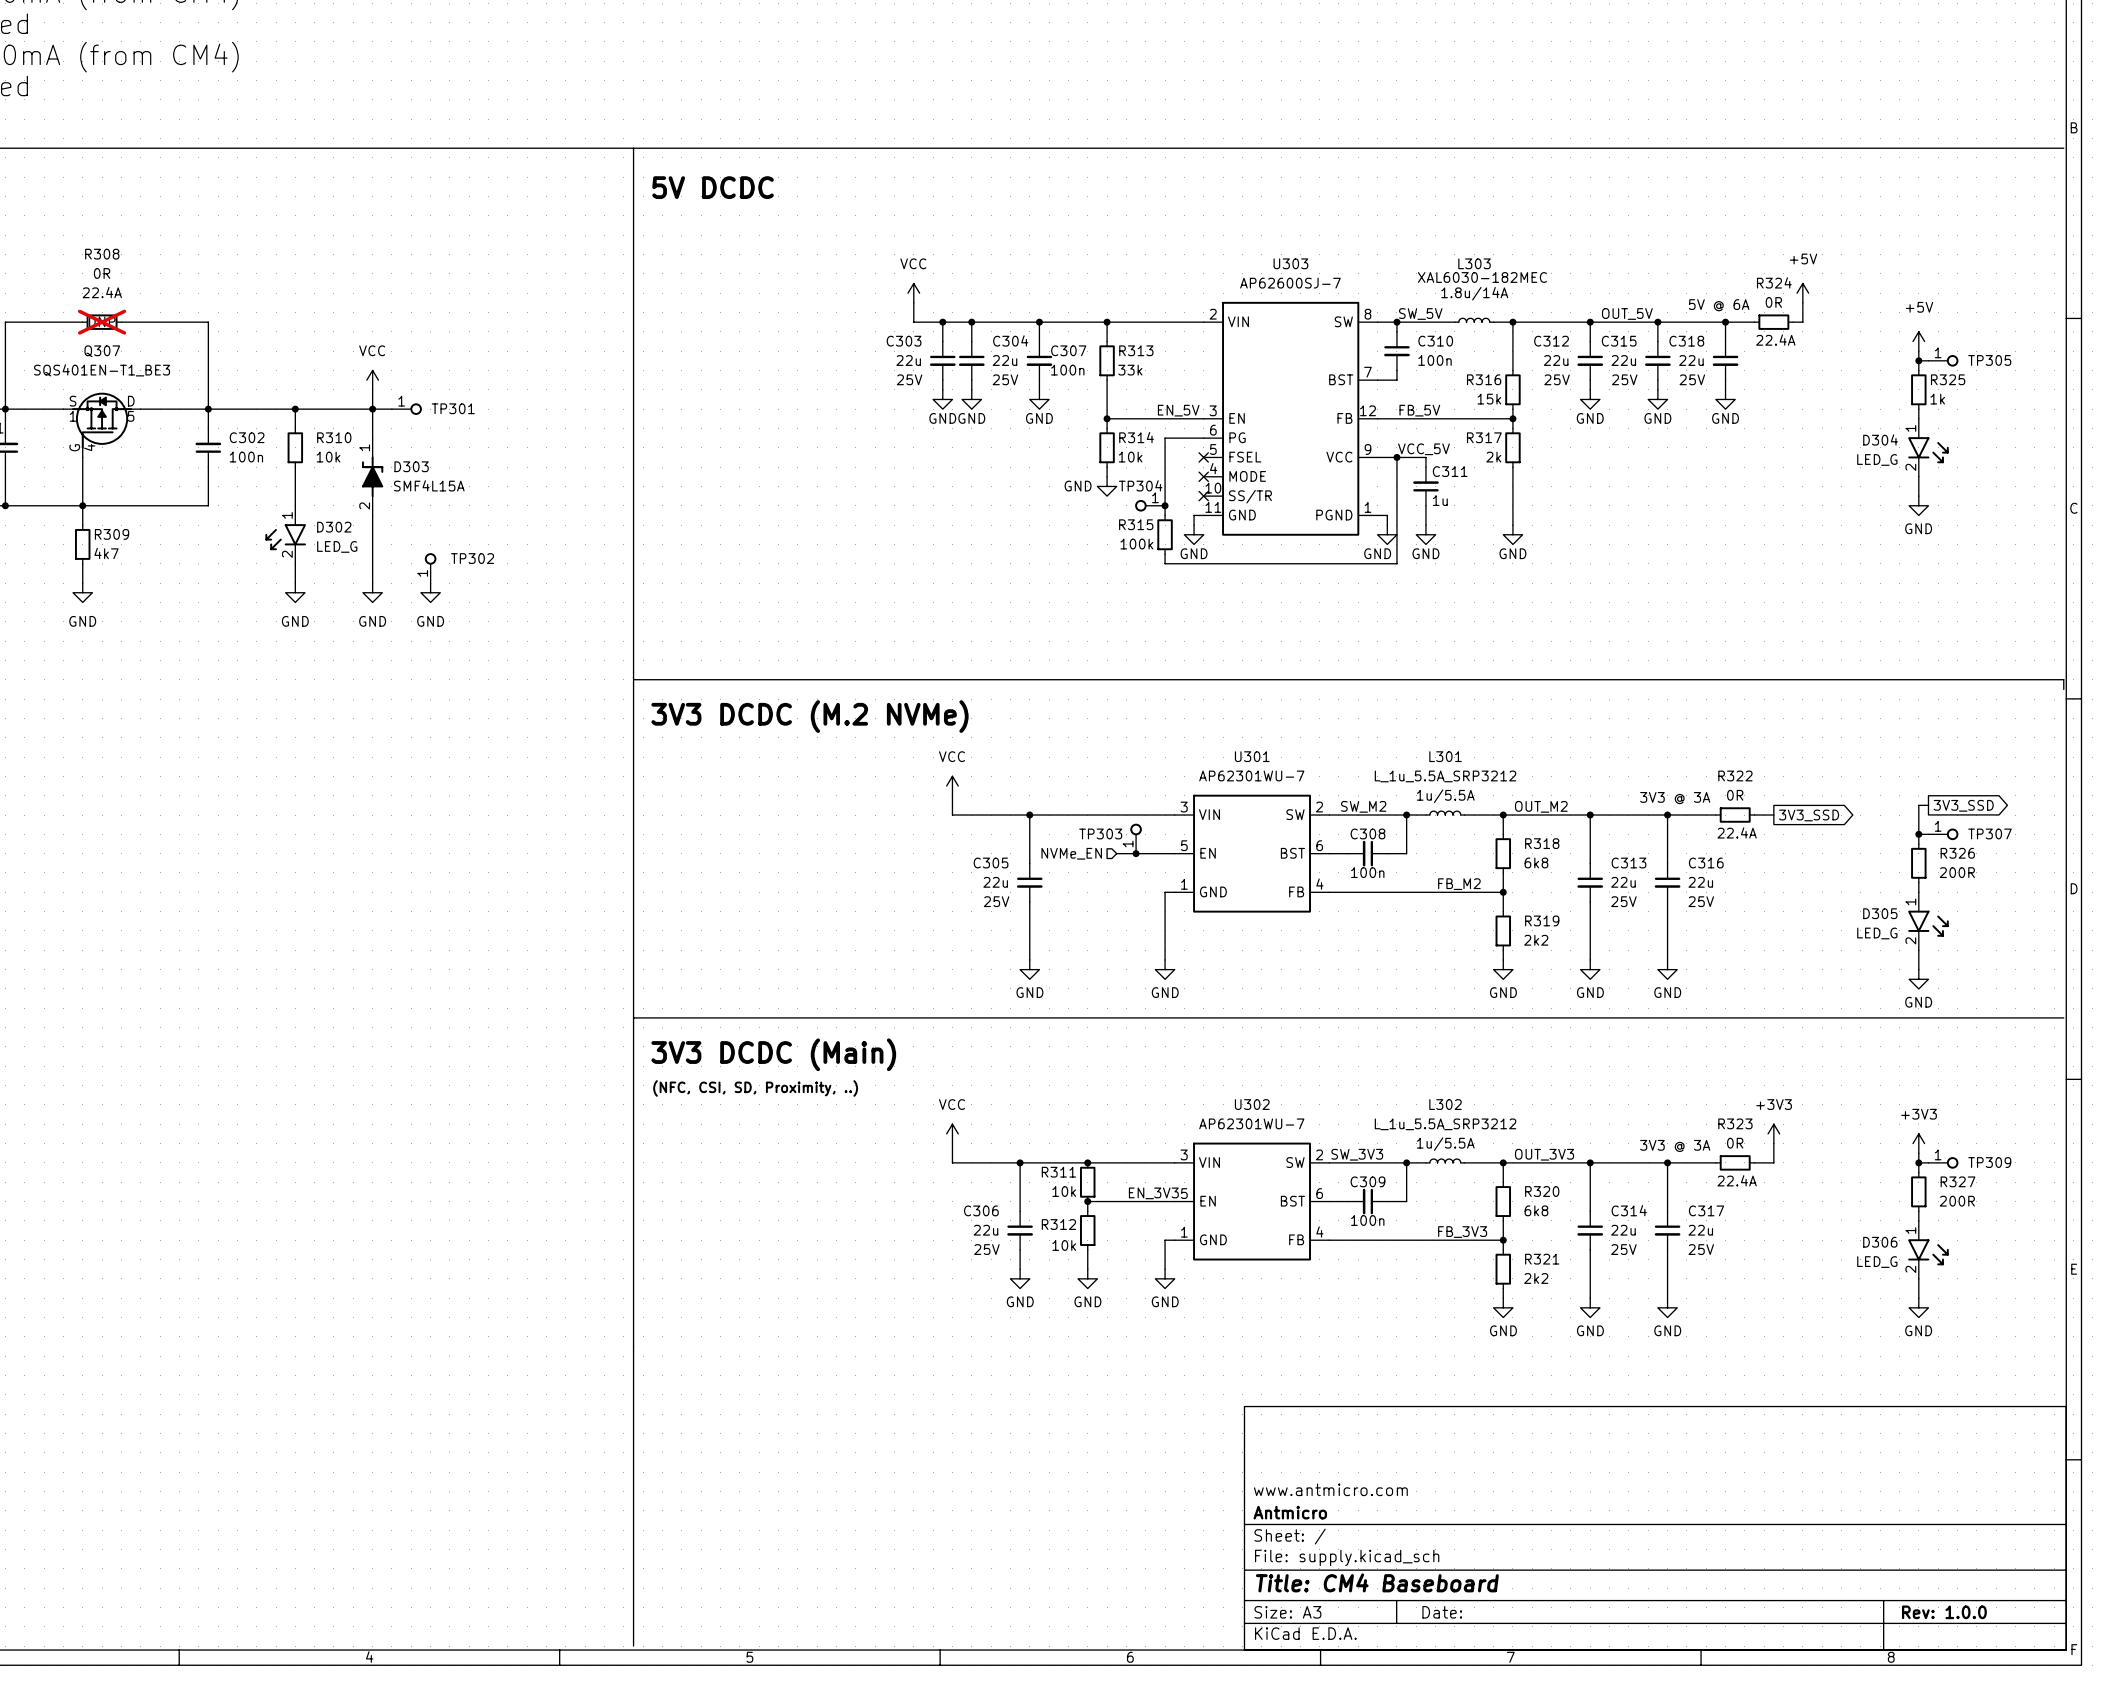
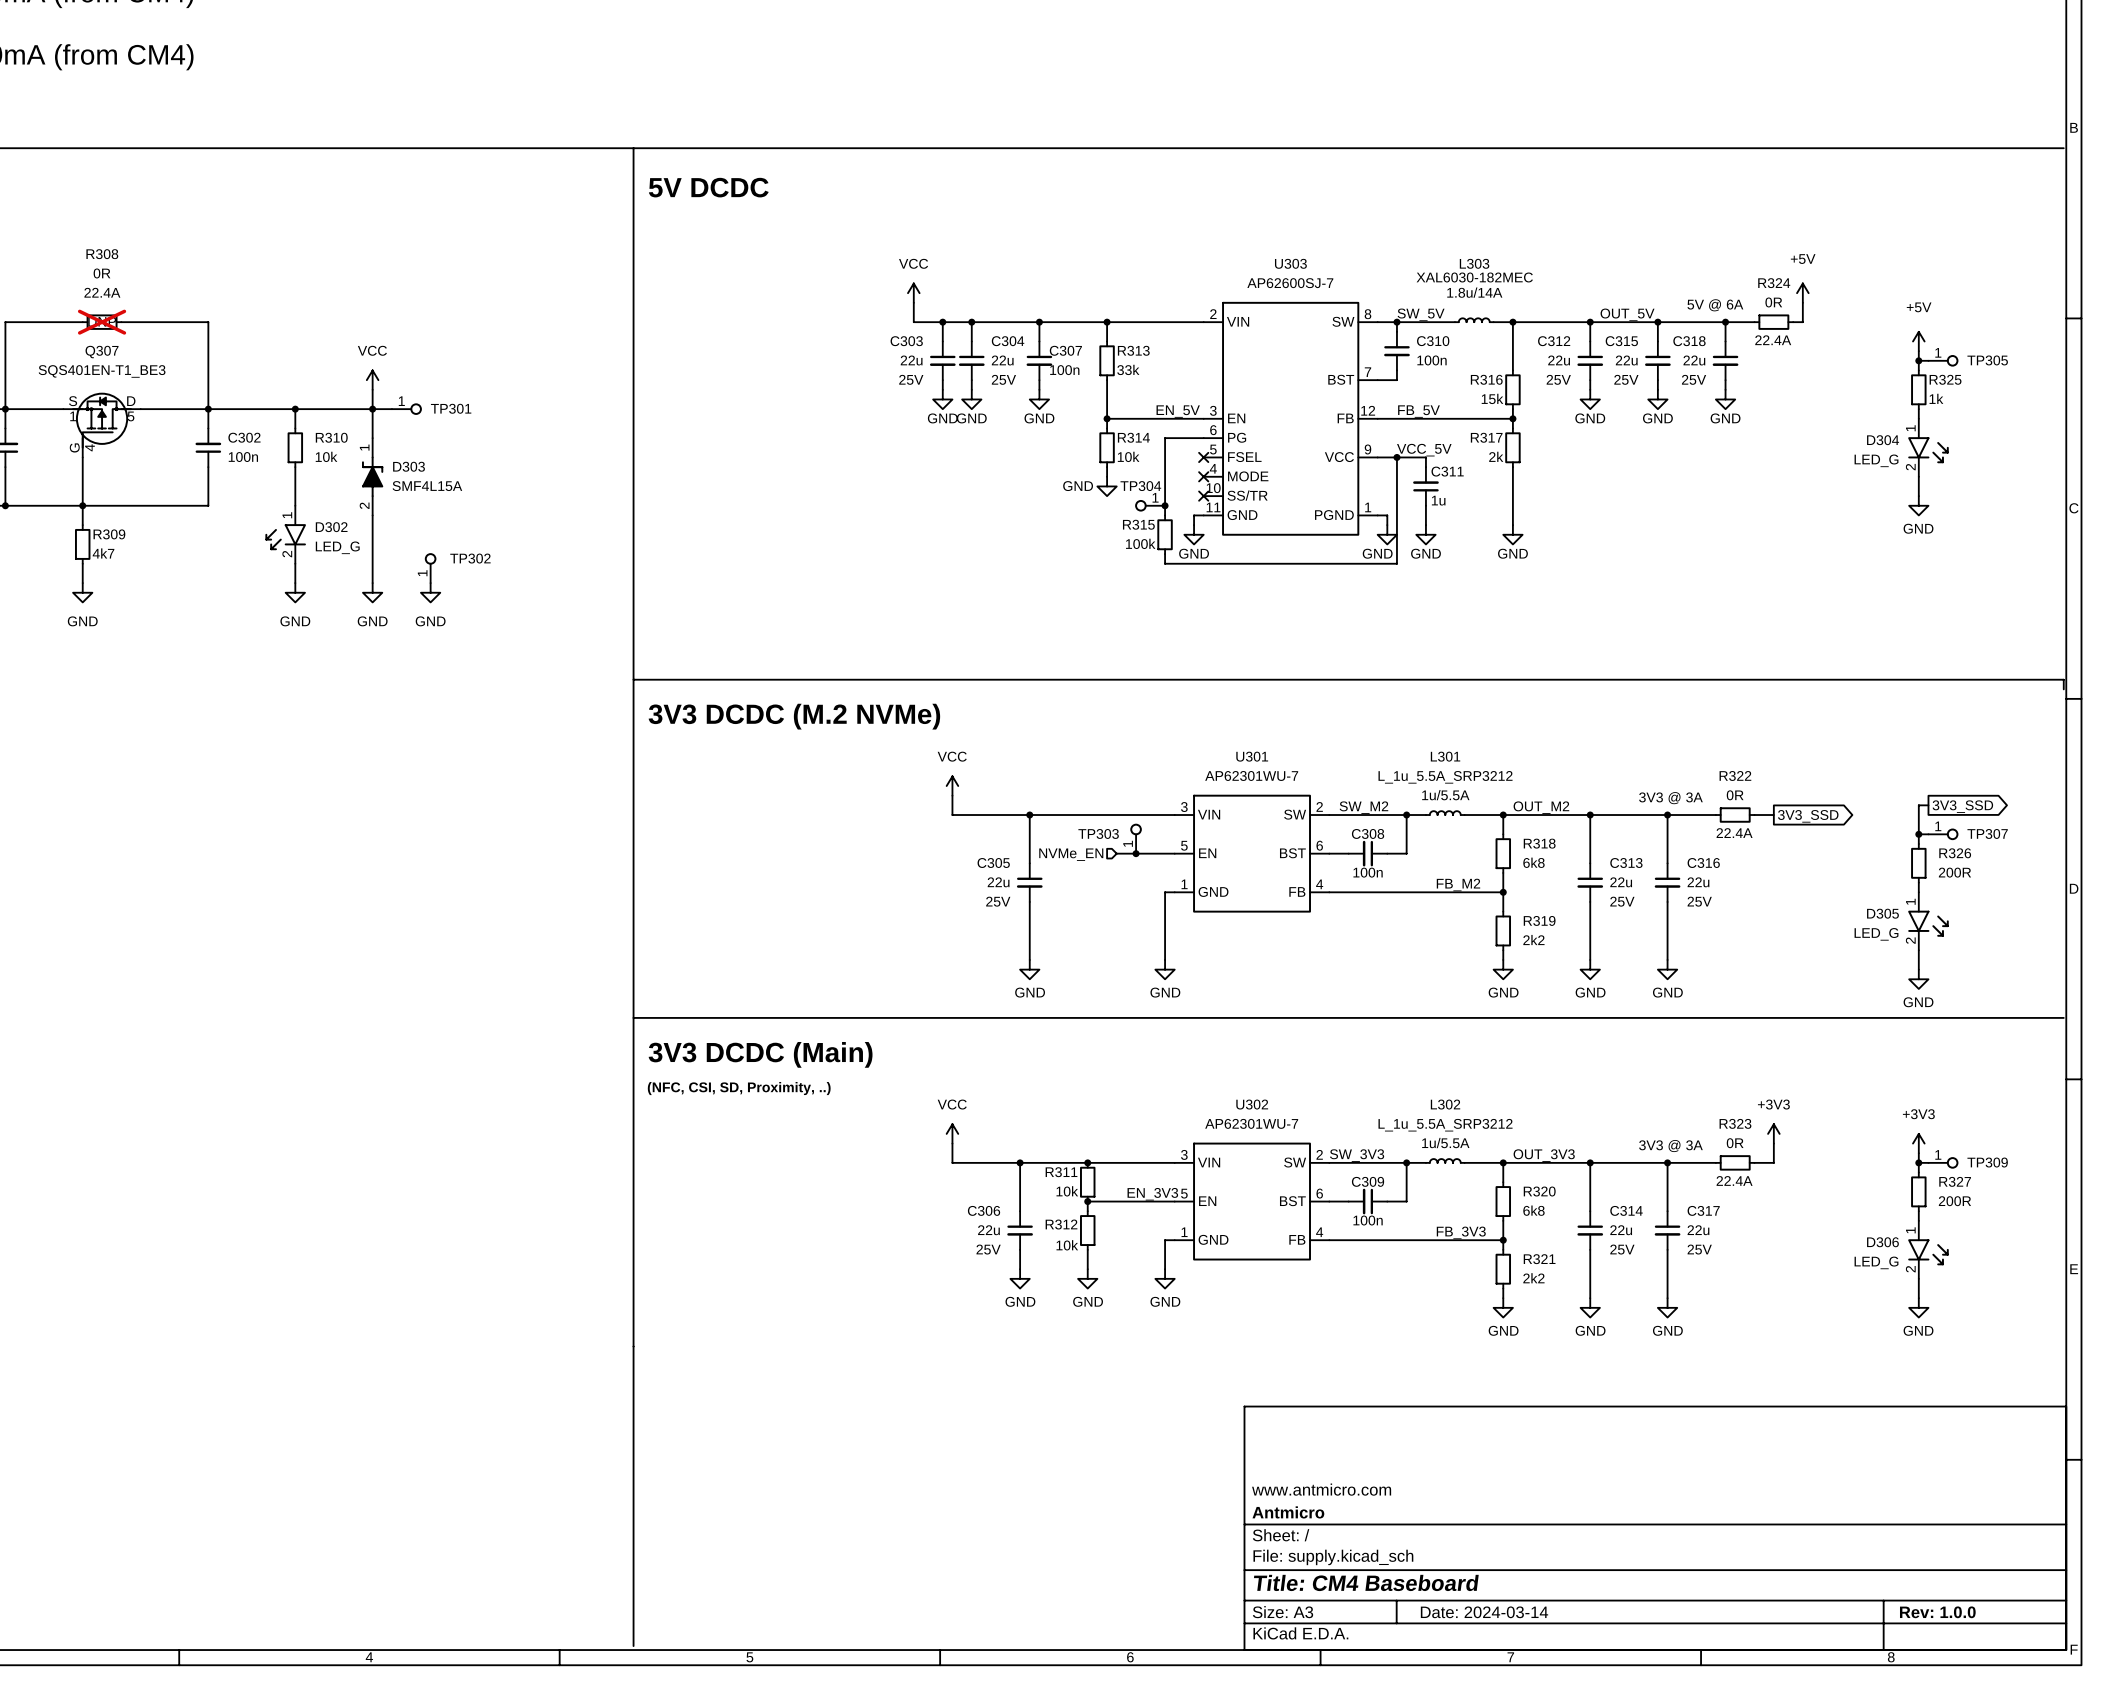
title block: Date: (1442, 1612) -> Date: 2024-03-14 (1484, 1612)

